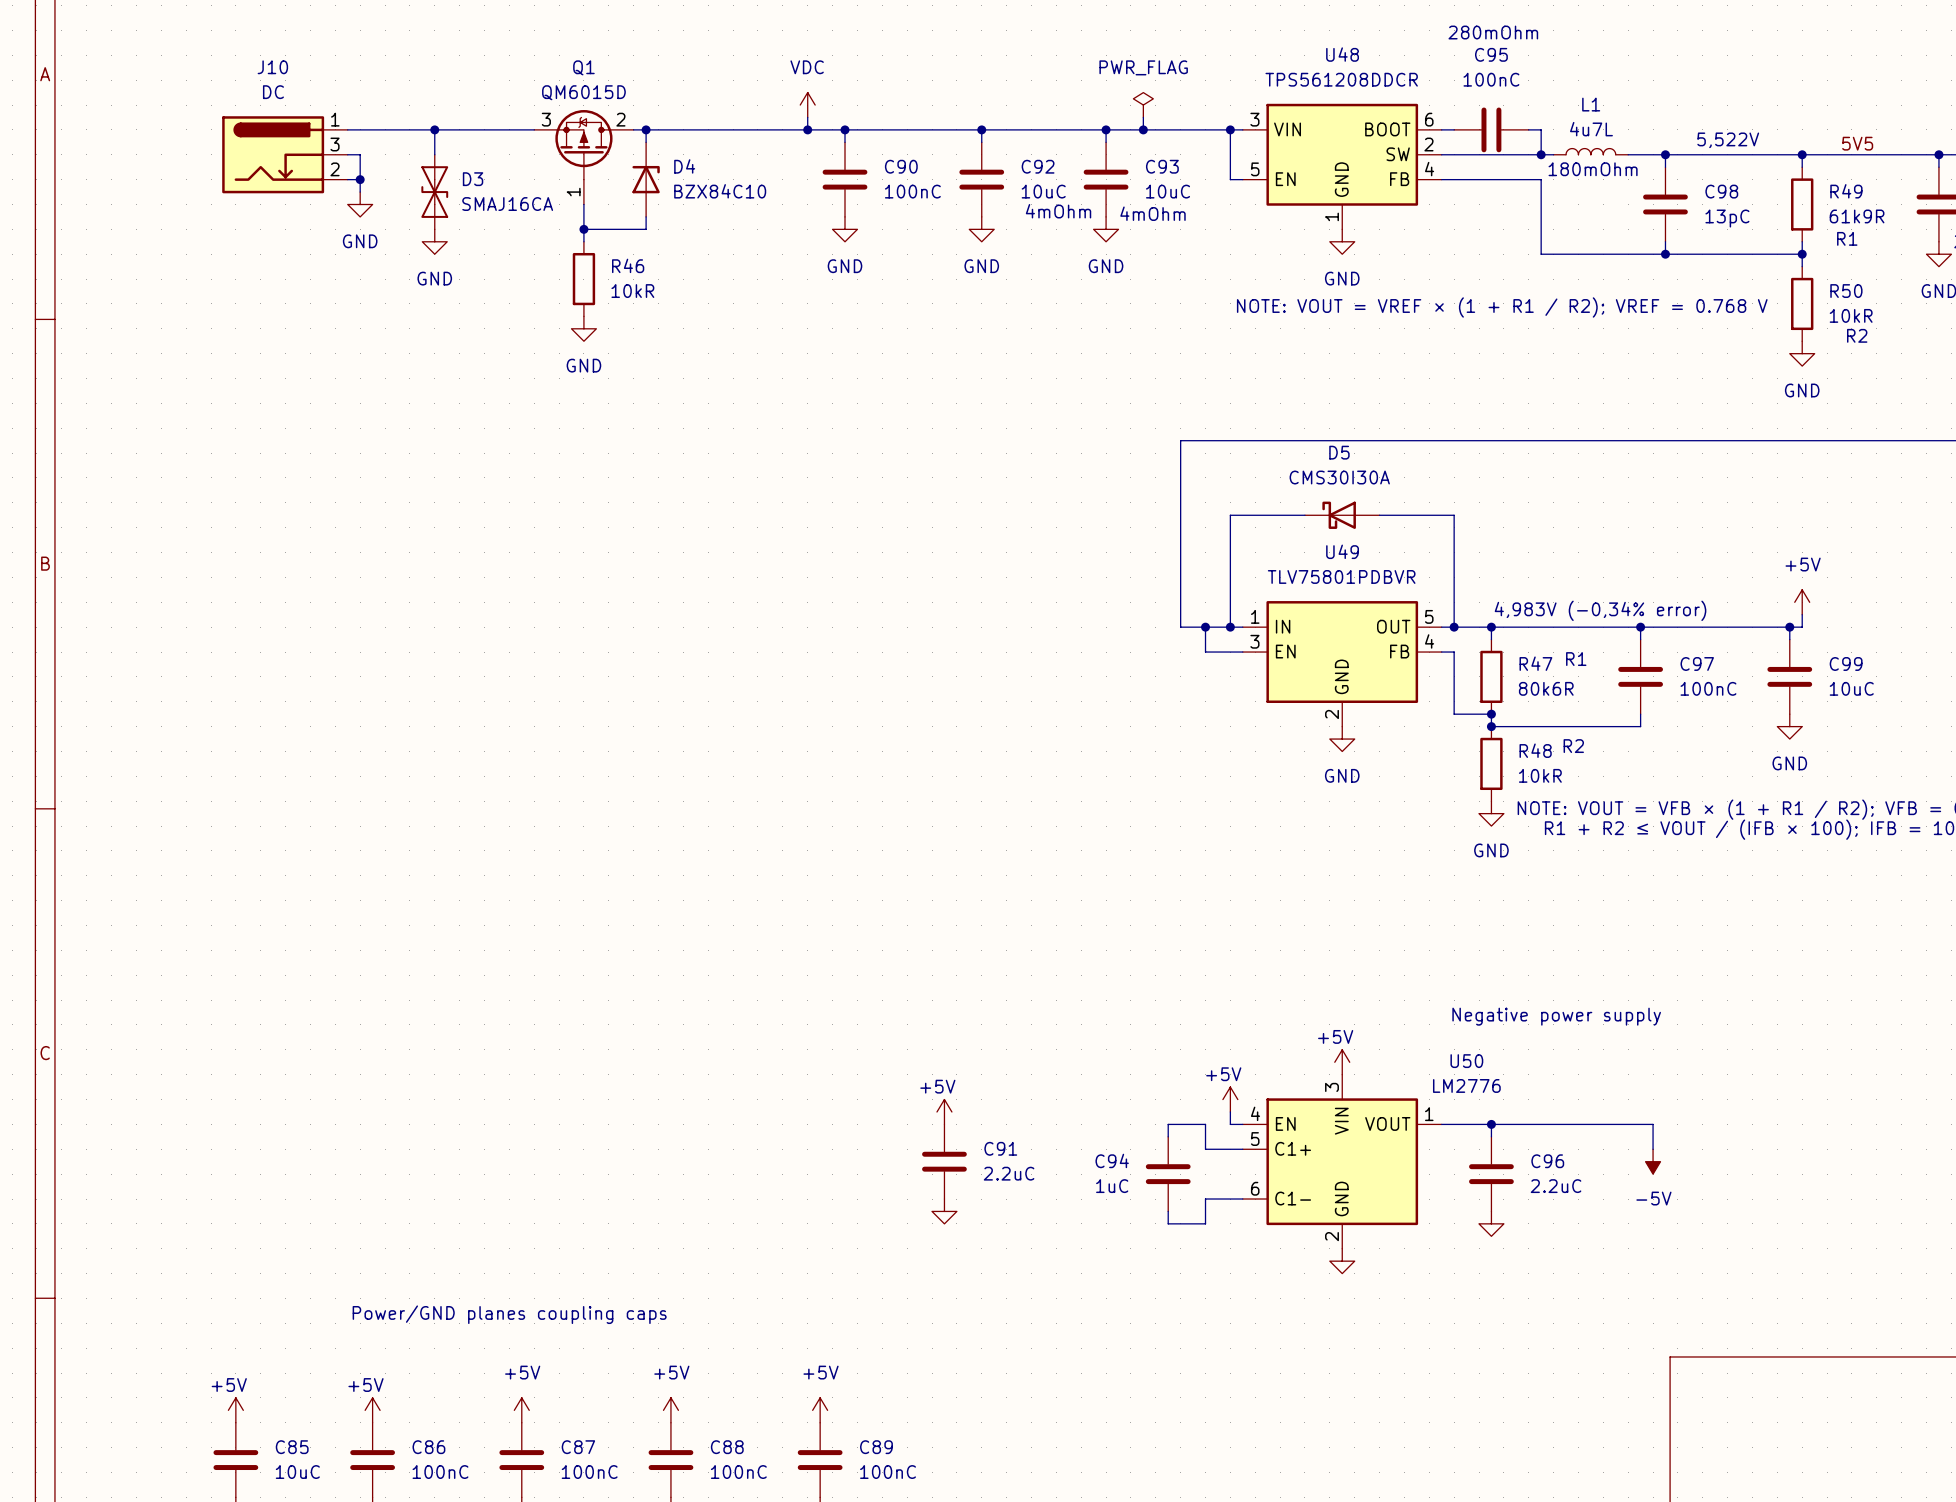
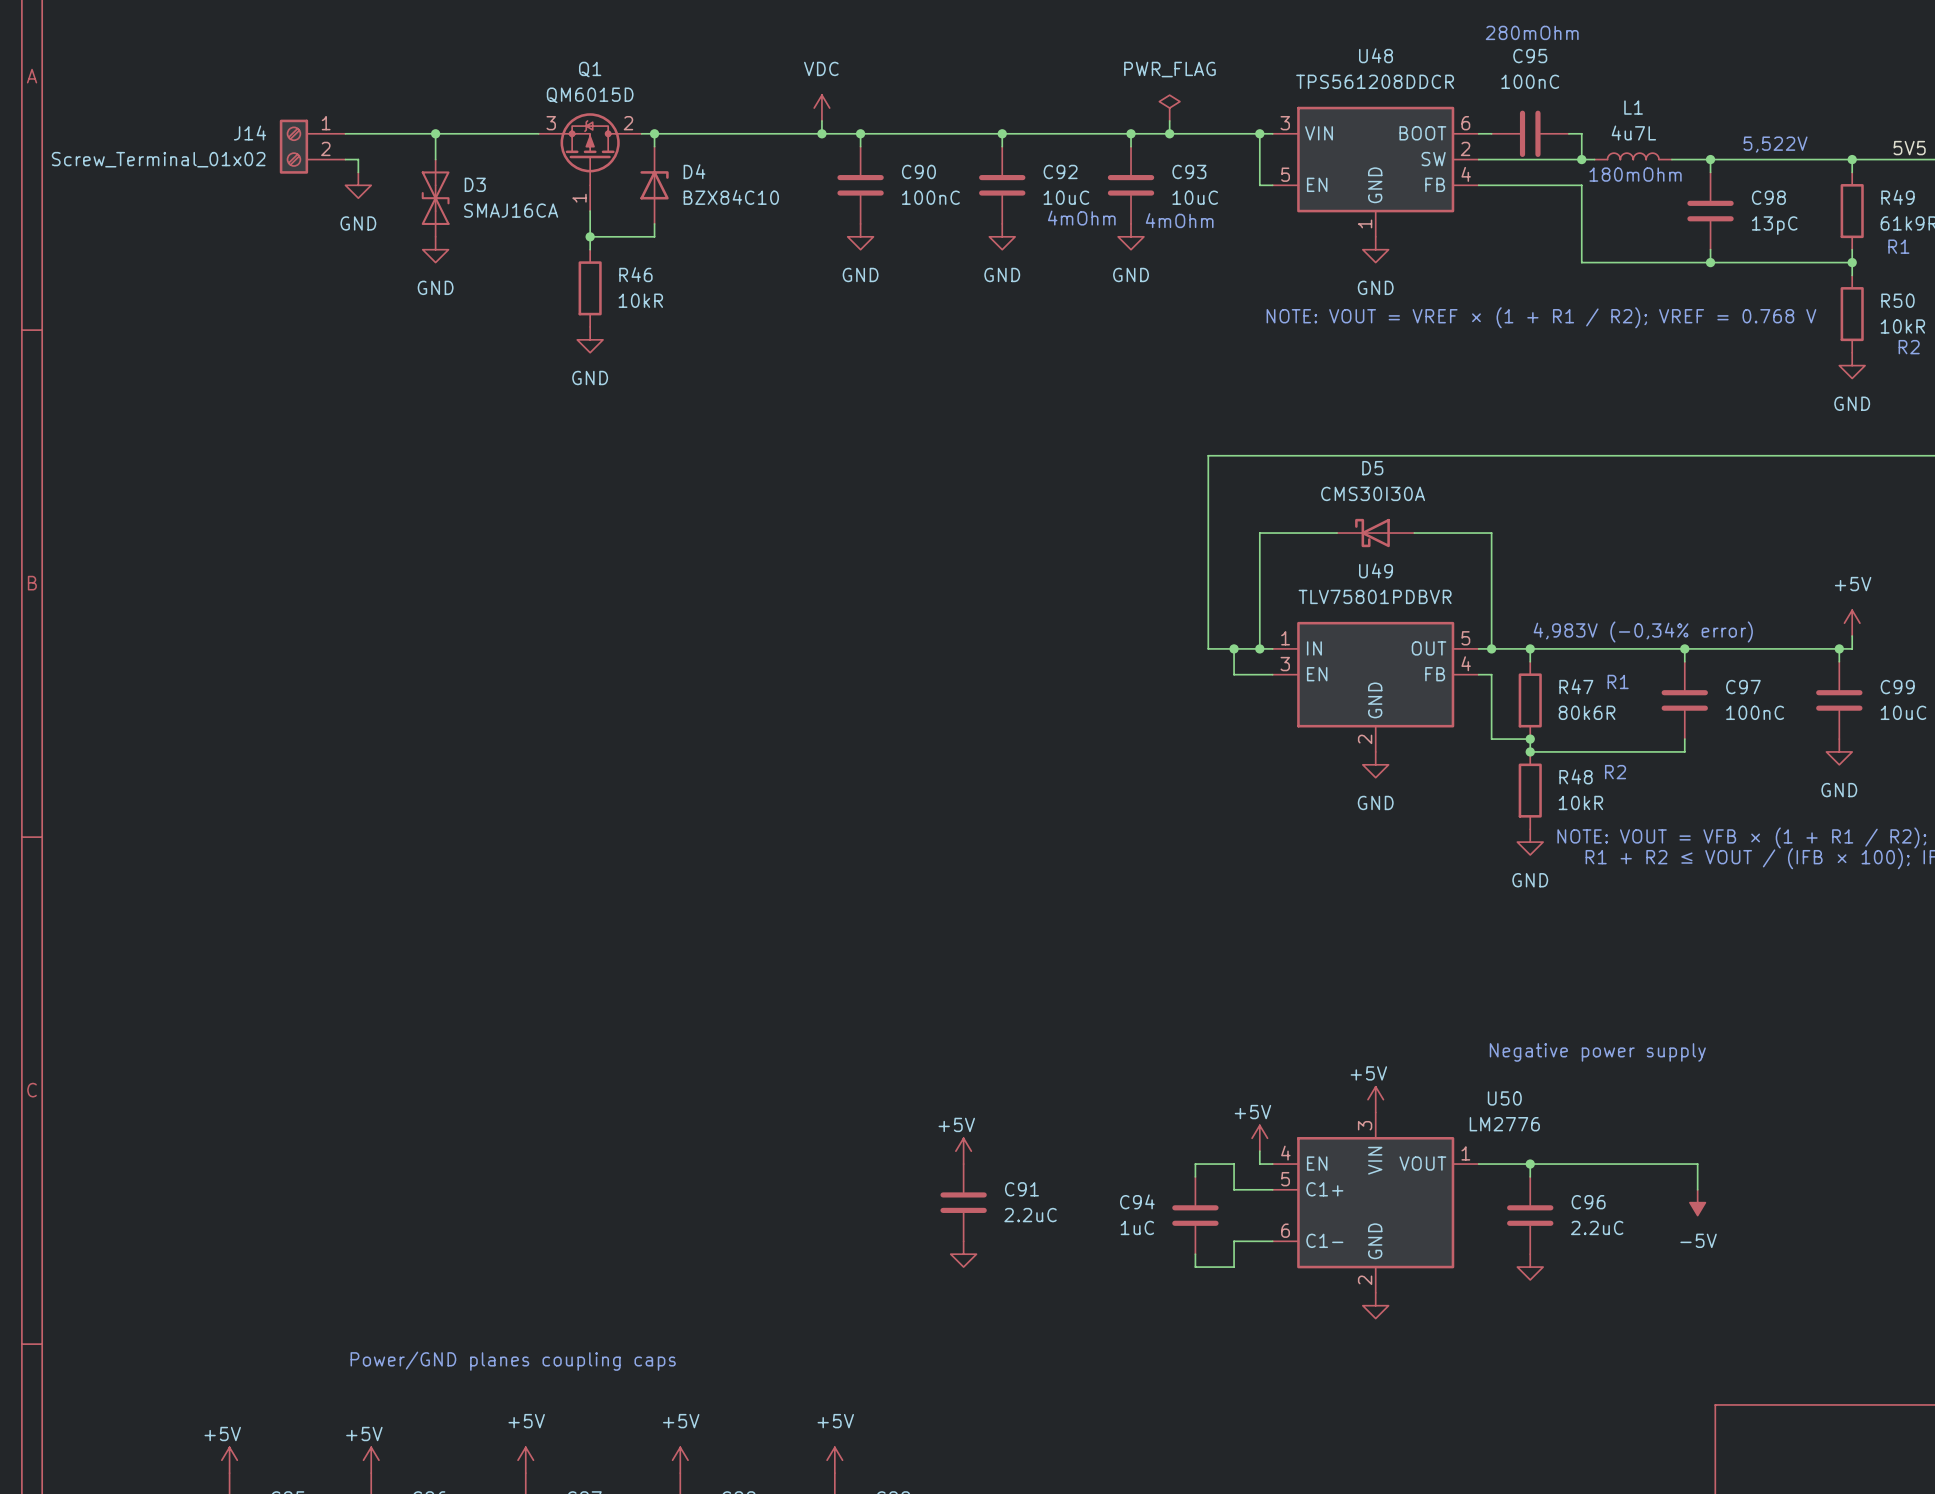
J14: none -> Screw_Terminal_01x02 (312, 146)
J10: DC (284, 154) -> none
junction: (360, 179) -> none
power symbol position: GND (360, 204) -> GND (358, 185)

